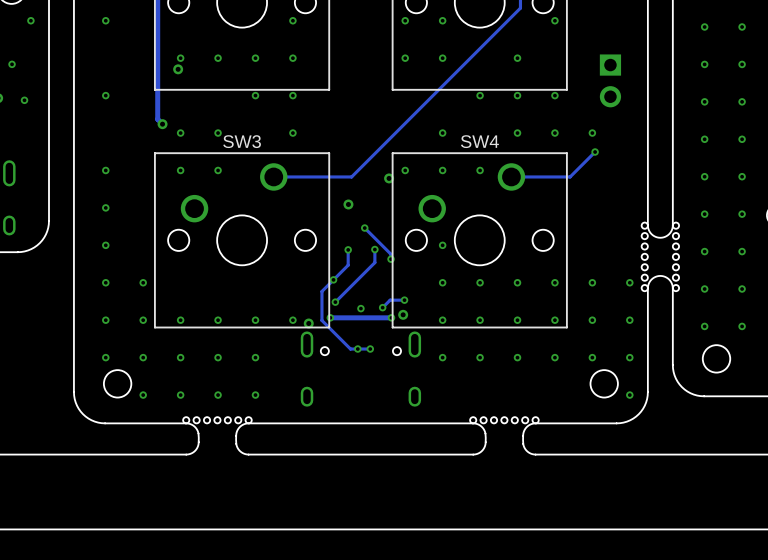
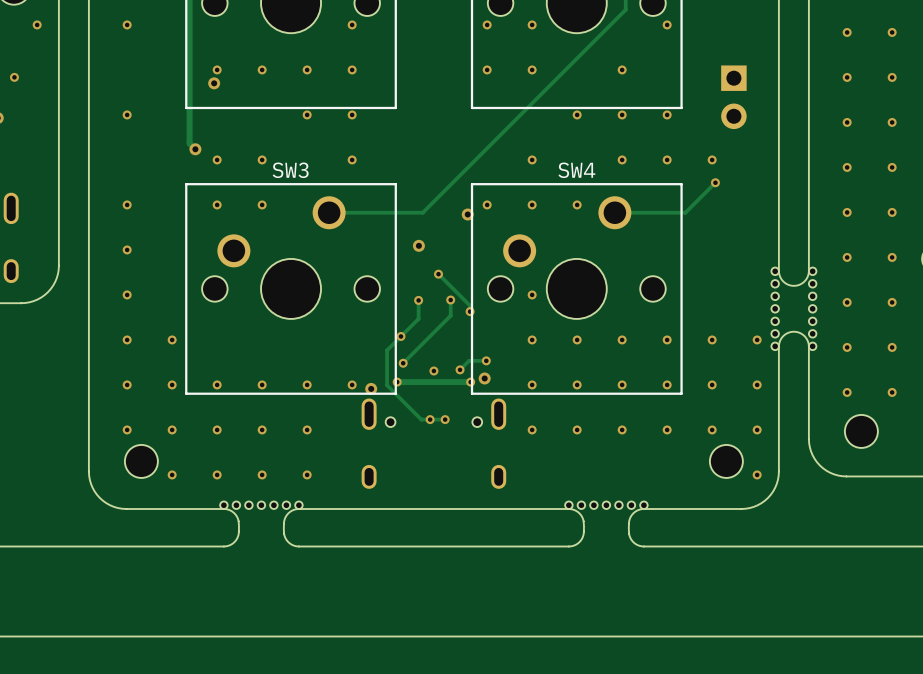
via: (24, 100) -> none

